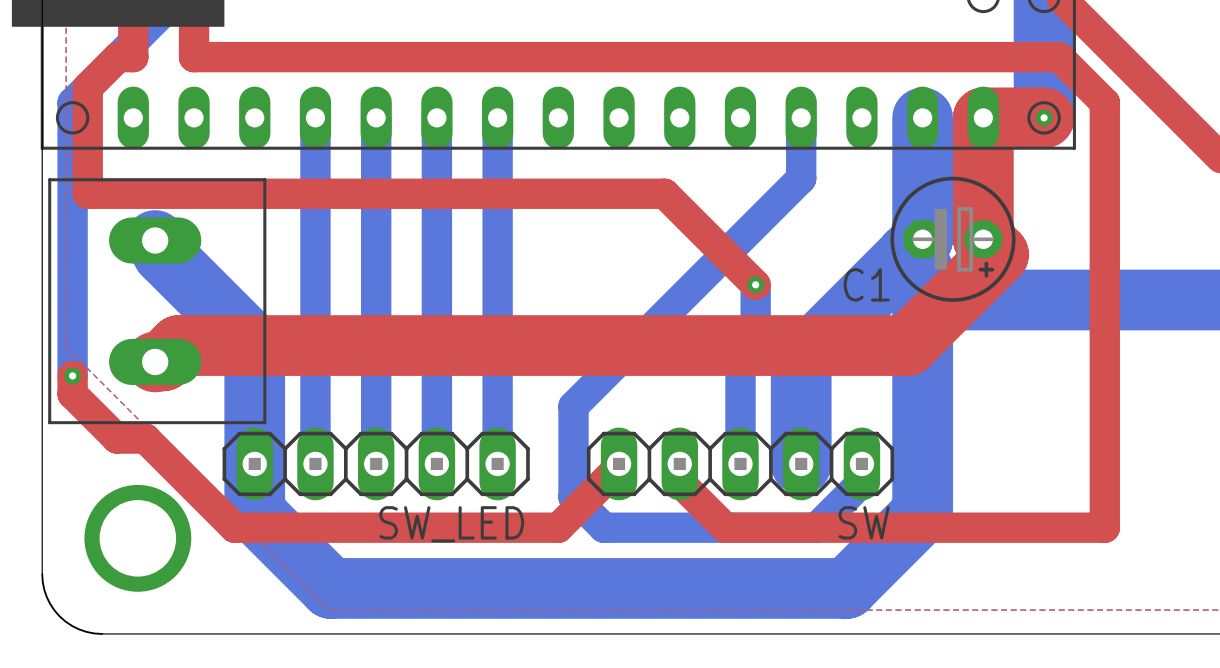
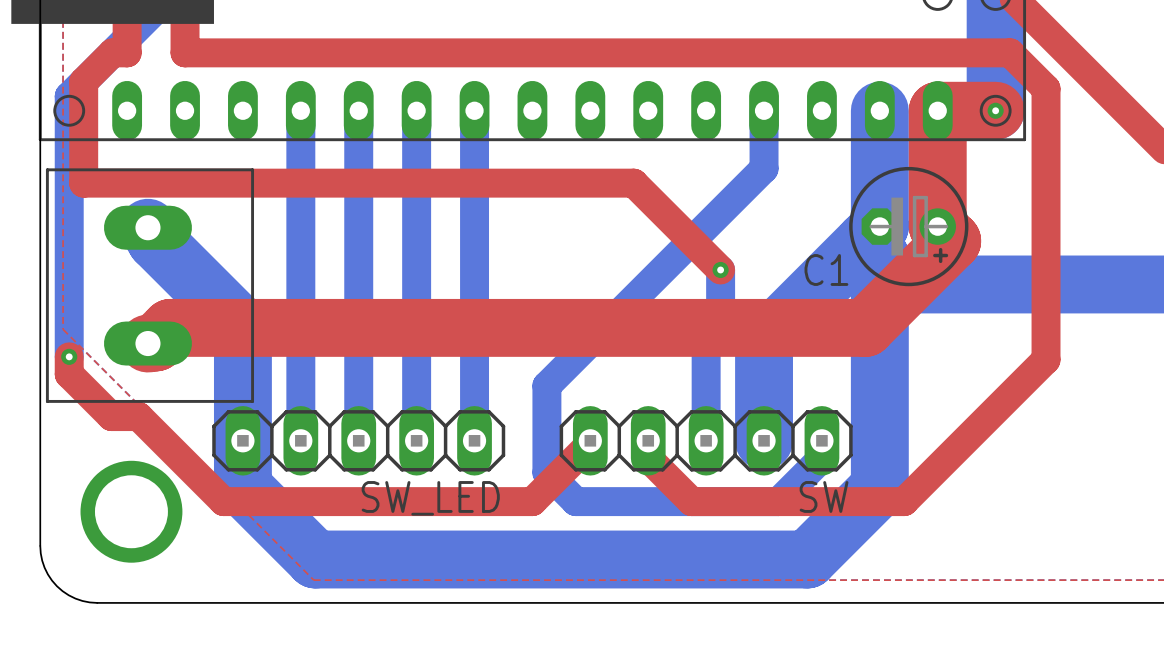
top track: (1096, 94) (1104, 102) (1104, 527) (948, 527) -> (1046, 88) (1046, 359) (904, 501)

